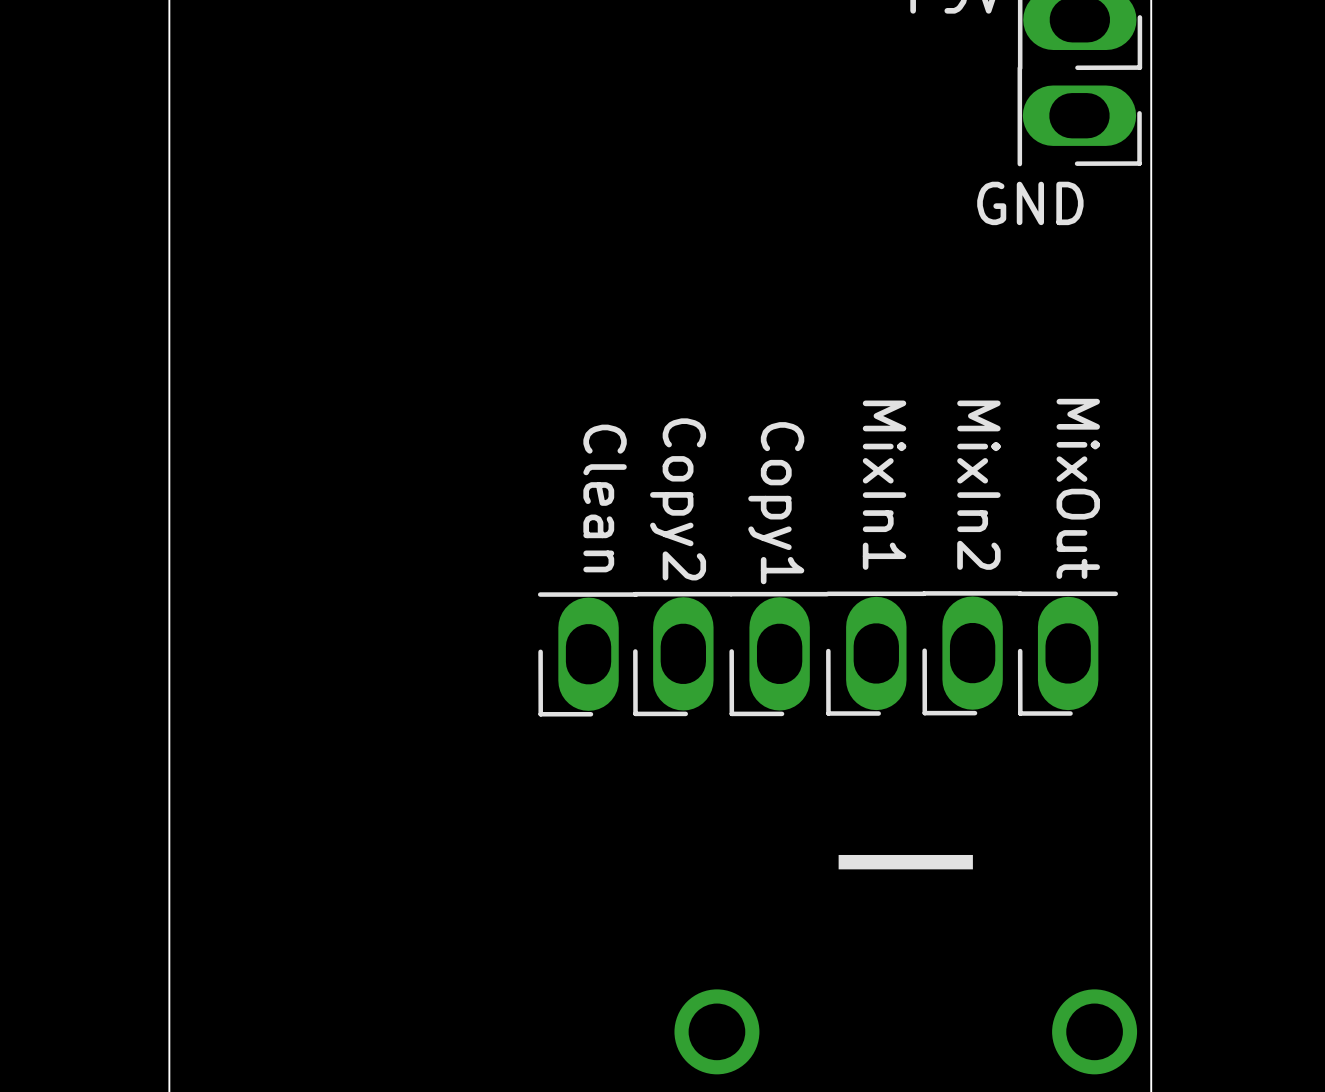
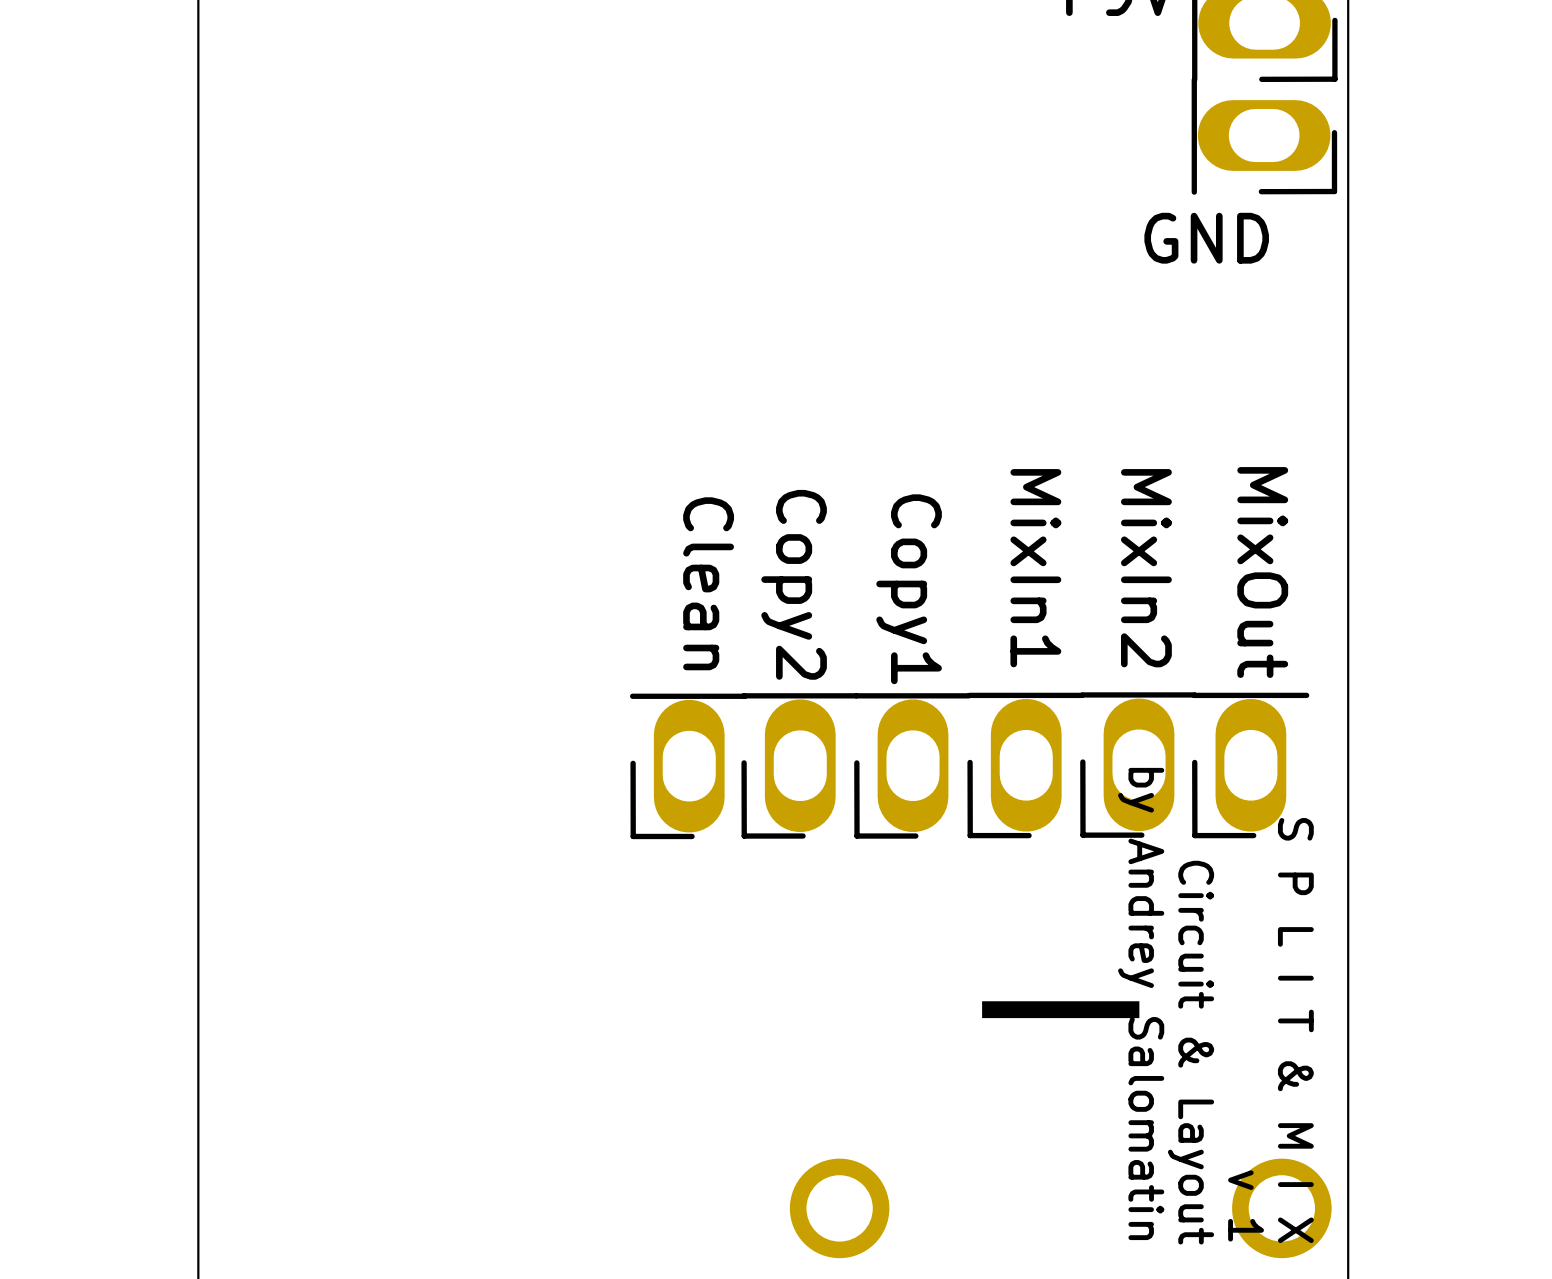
text: none -> by Andrey Salomatin (1141, 1003)
text: none -> S P L I T & M I X (1295, 1030)
text: none -> Circuit & Layout (1191, 1052)
text: none -> v 1 (1246, 1205)

